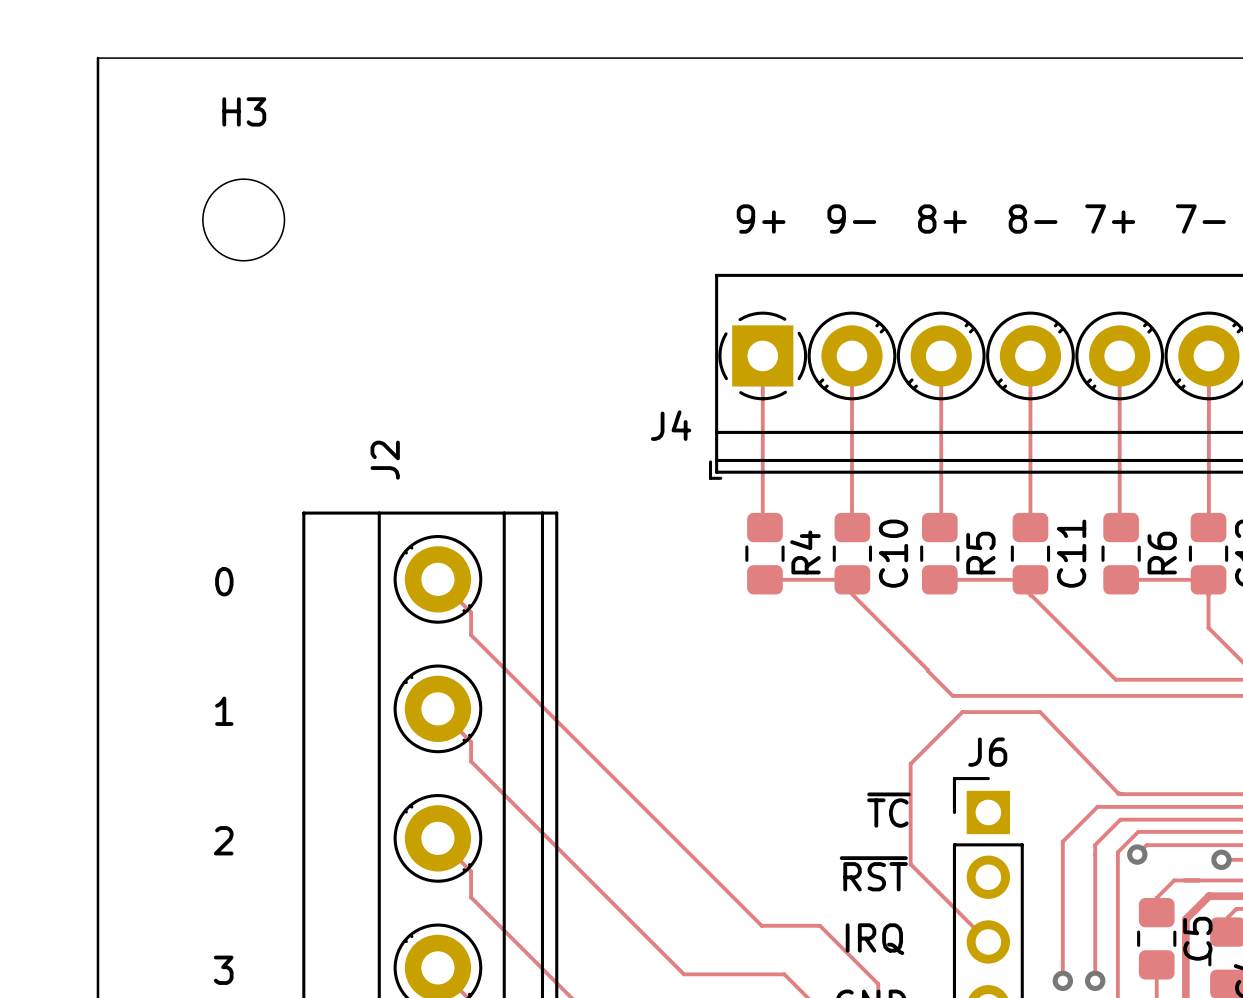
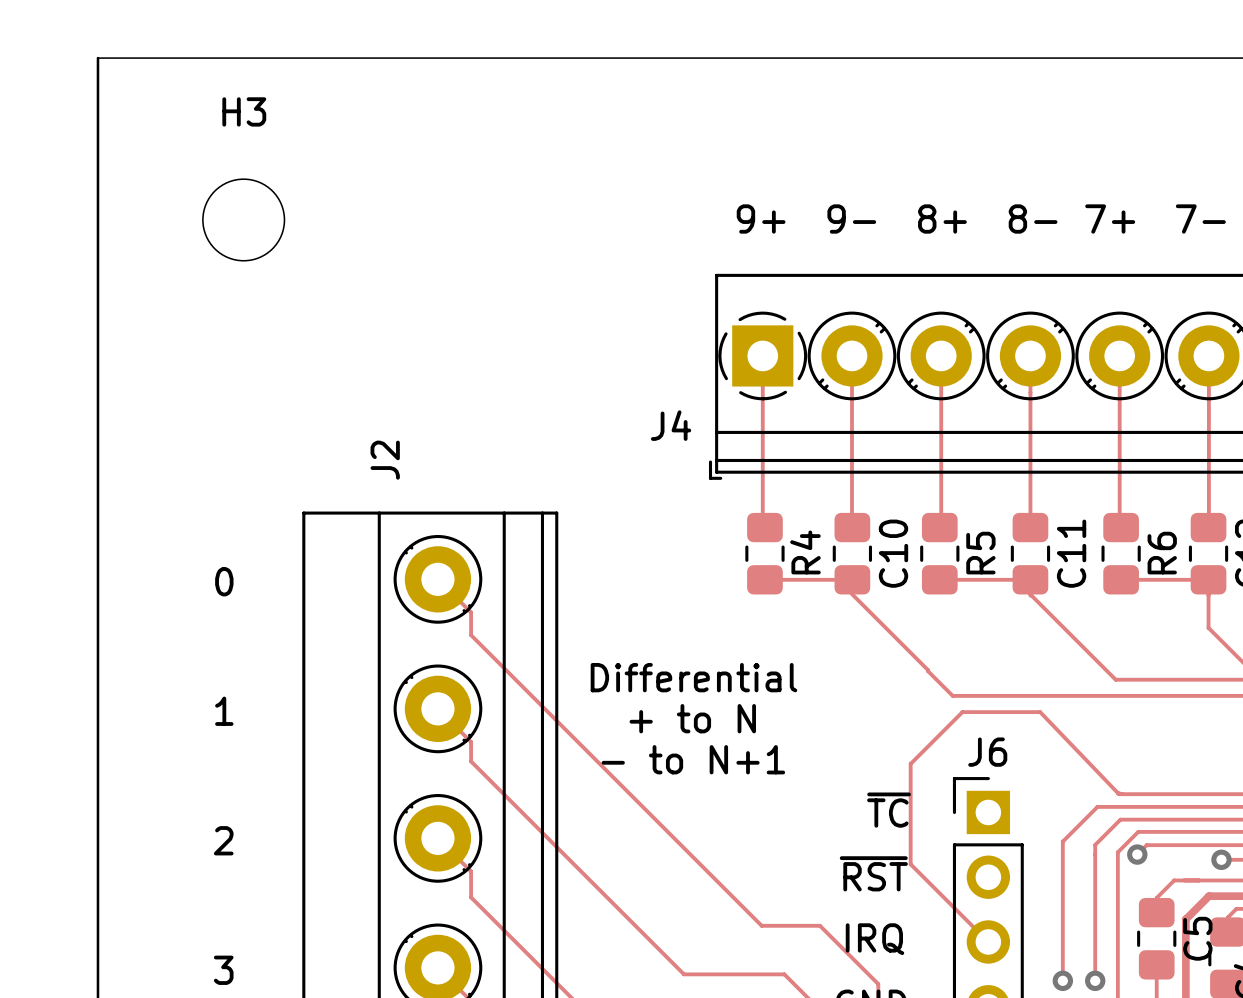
text: none -> Differential (693, 677)
text: none -> + to N (692, 718)
text: none -> - to N+1 (693, 759)

